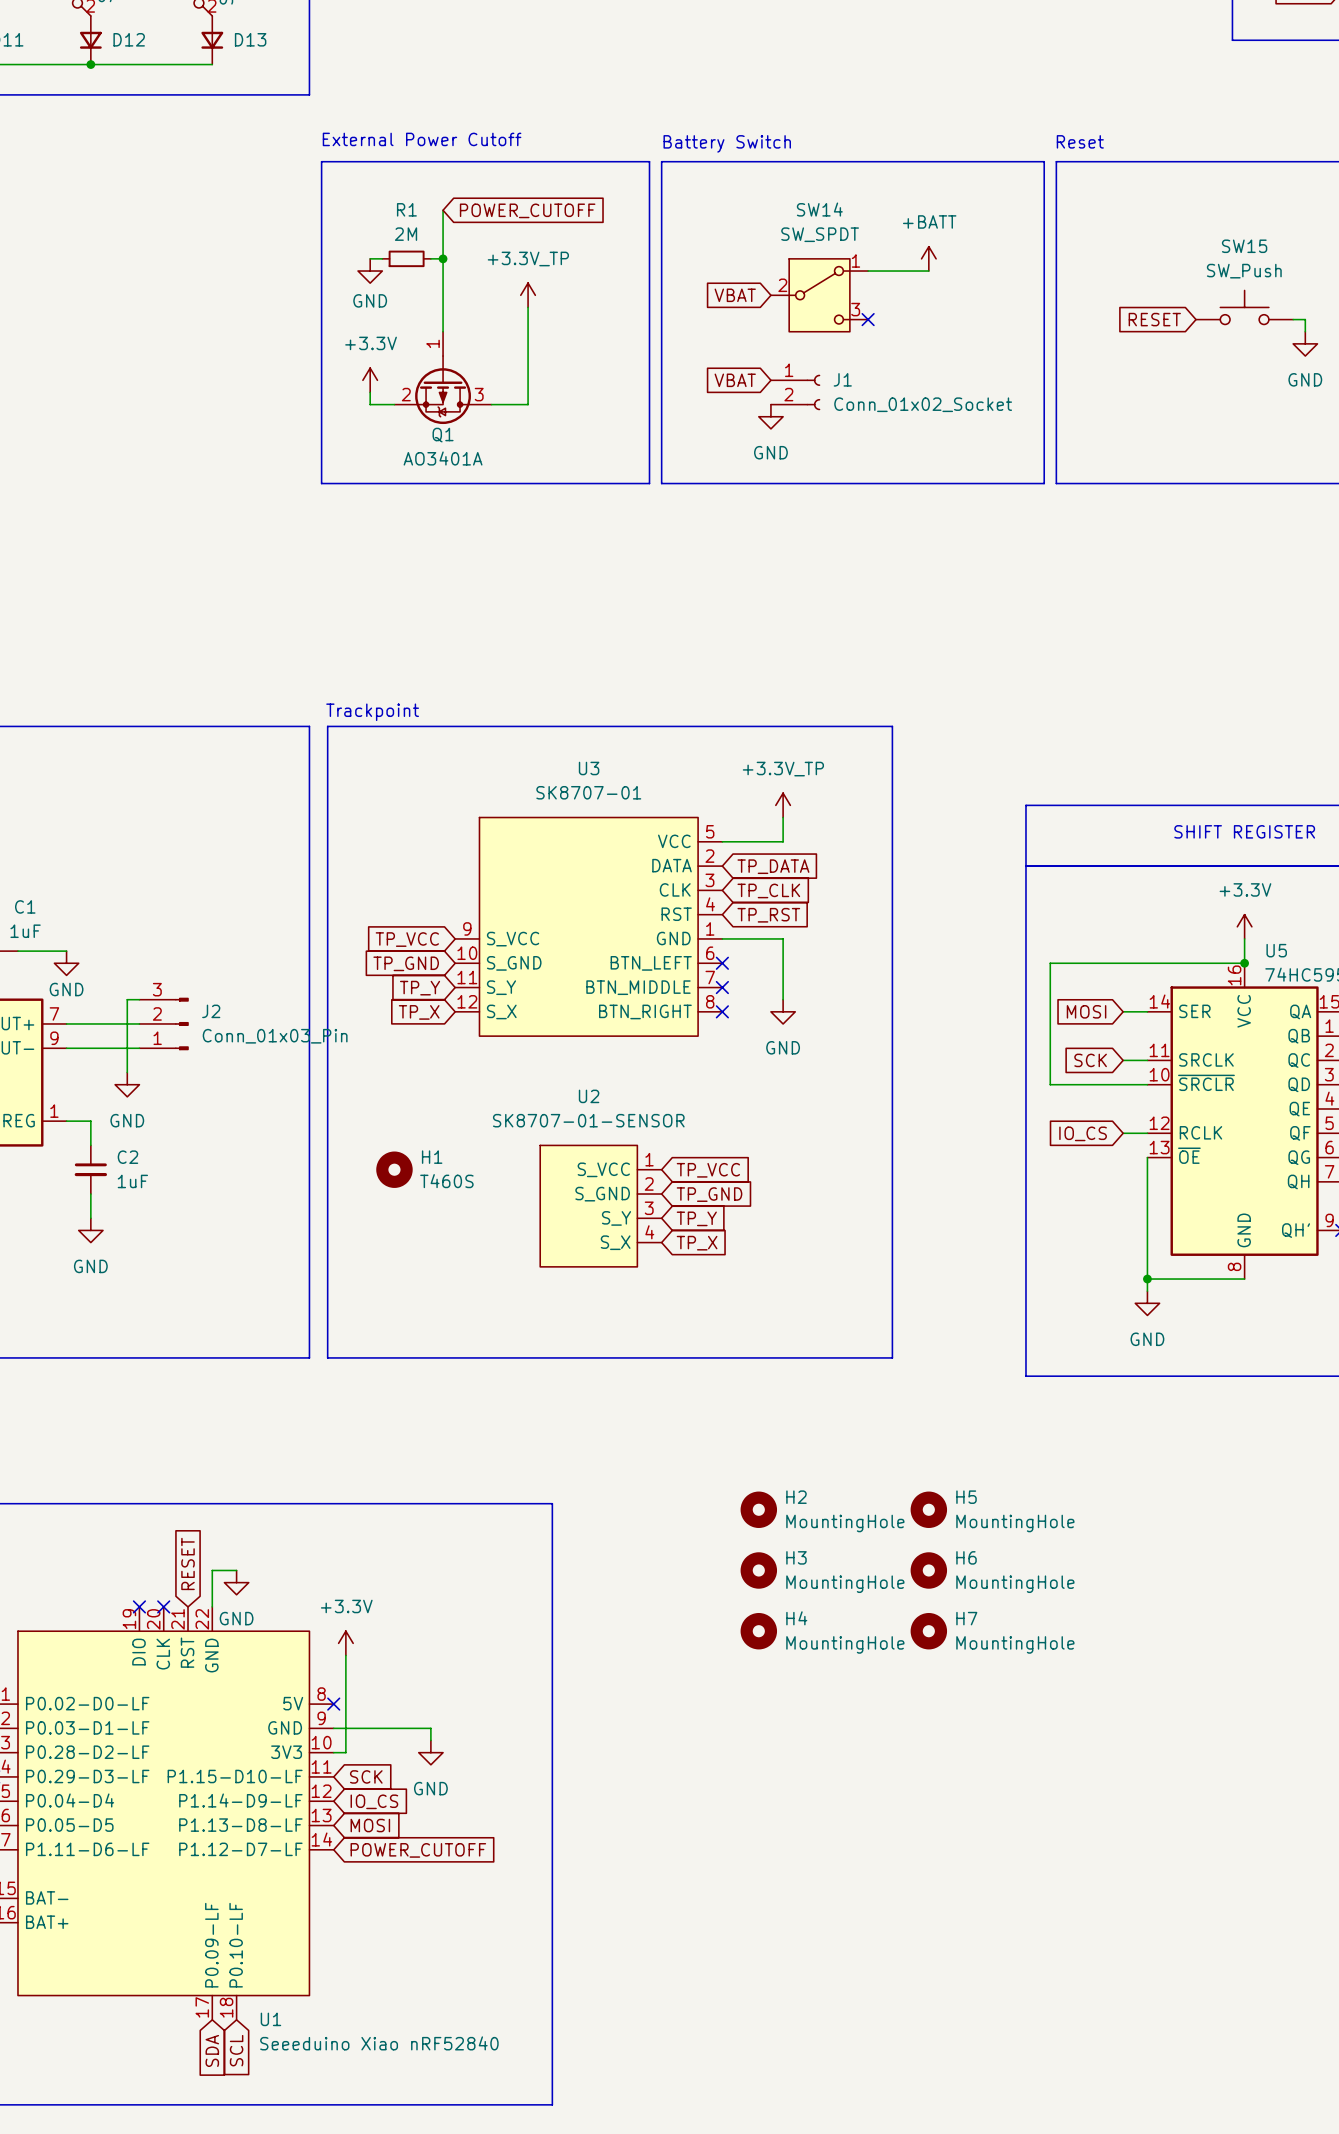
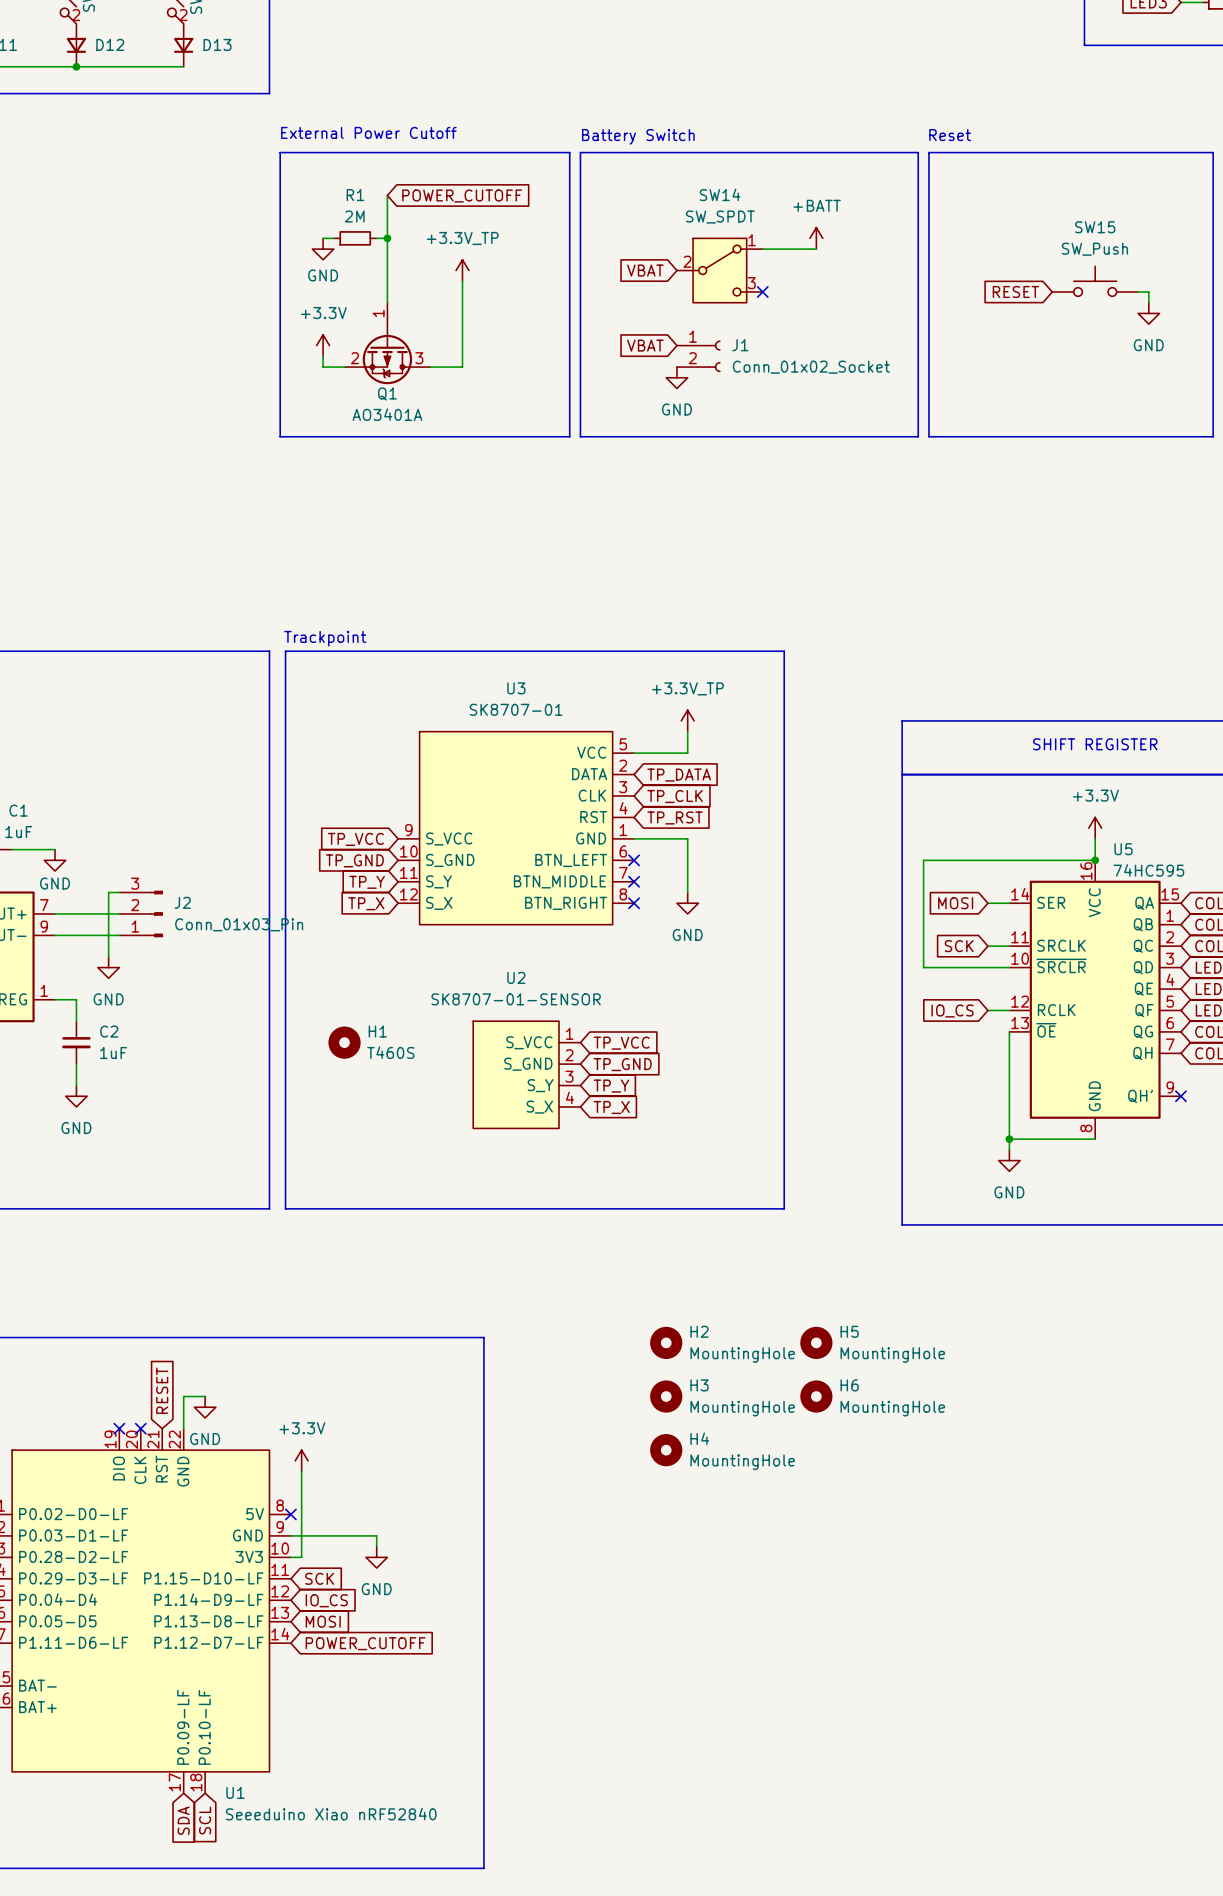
H7: MountingHole (928, 1631) -> none

